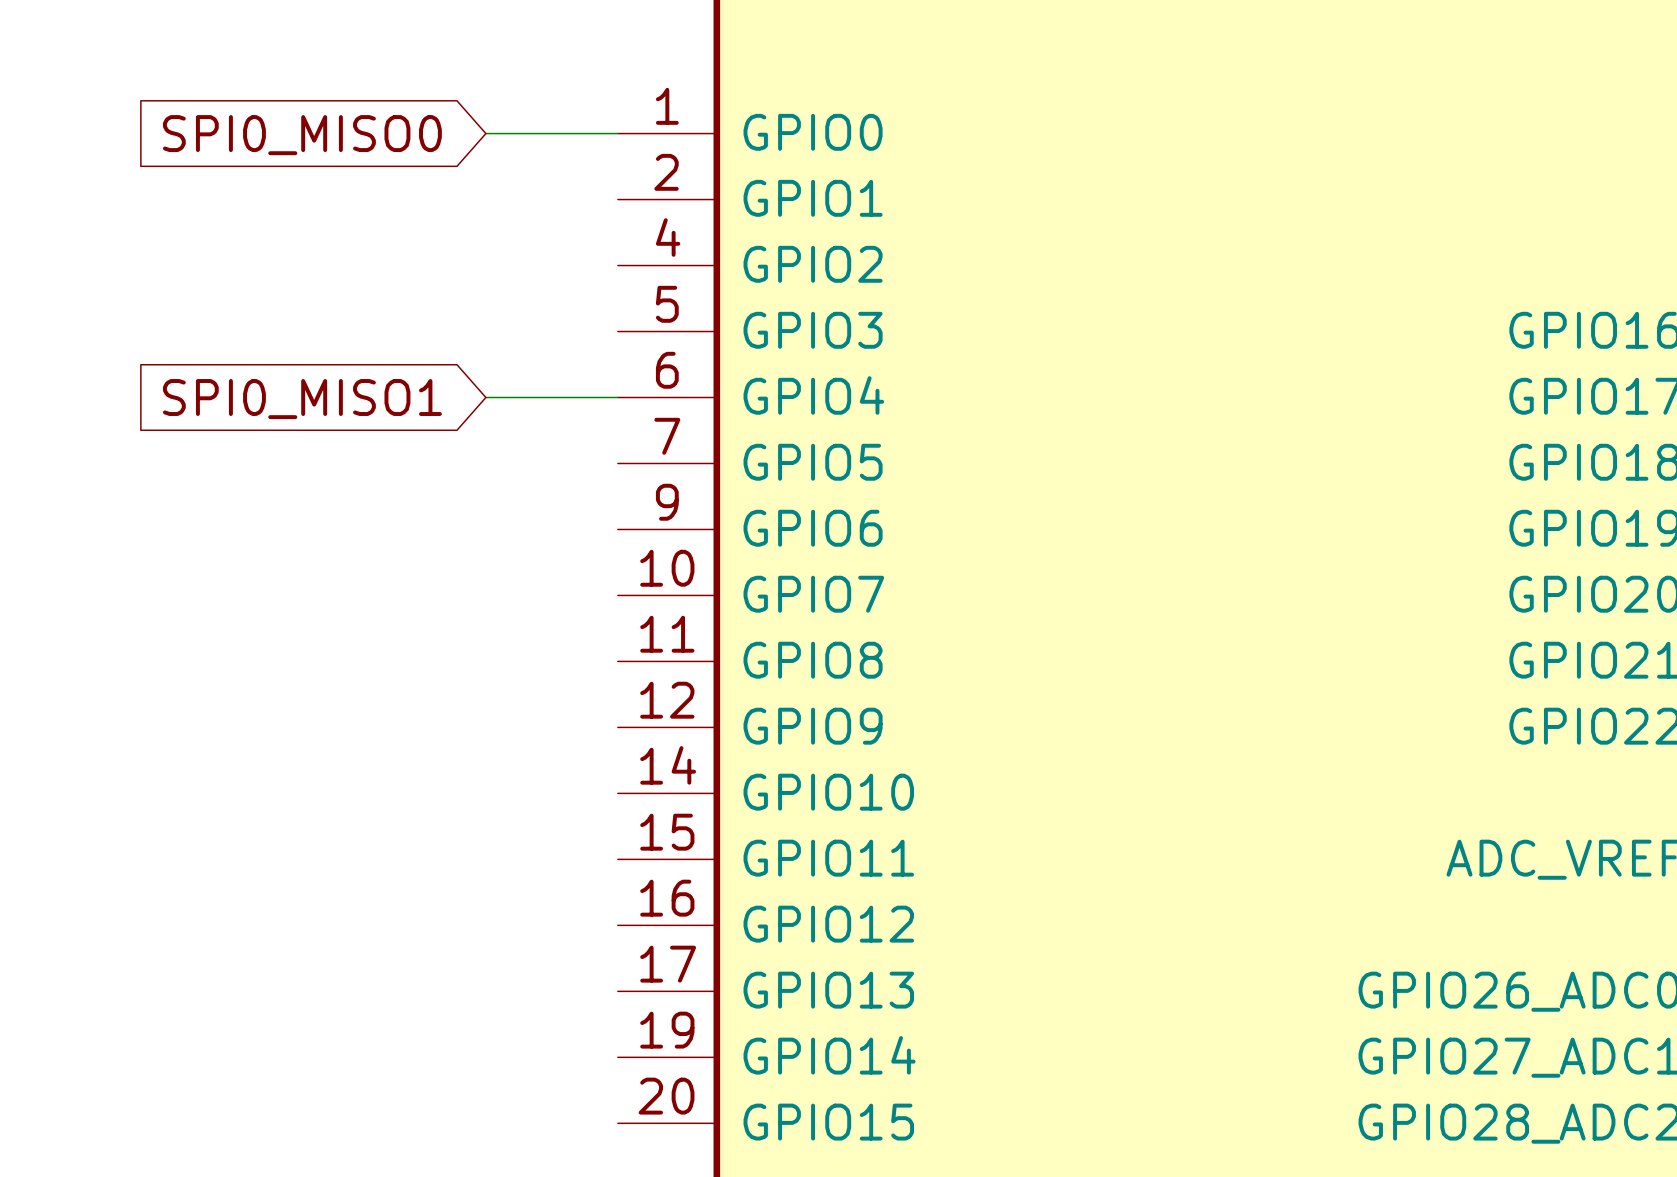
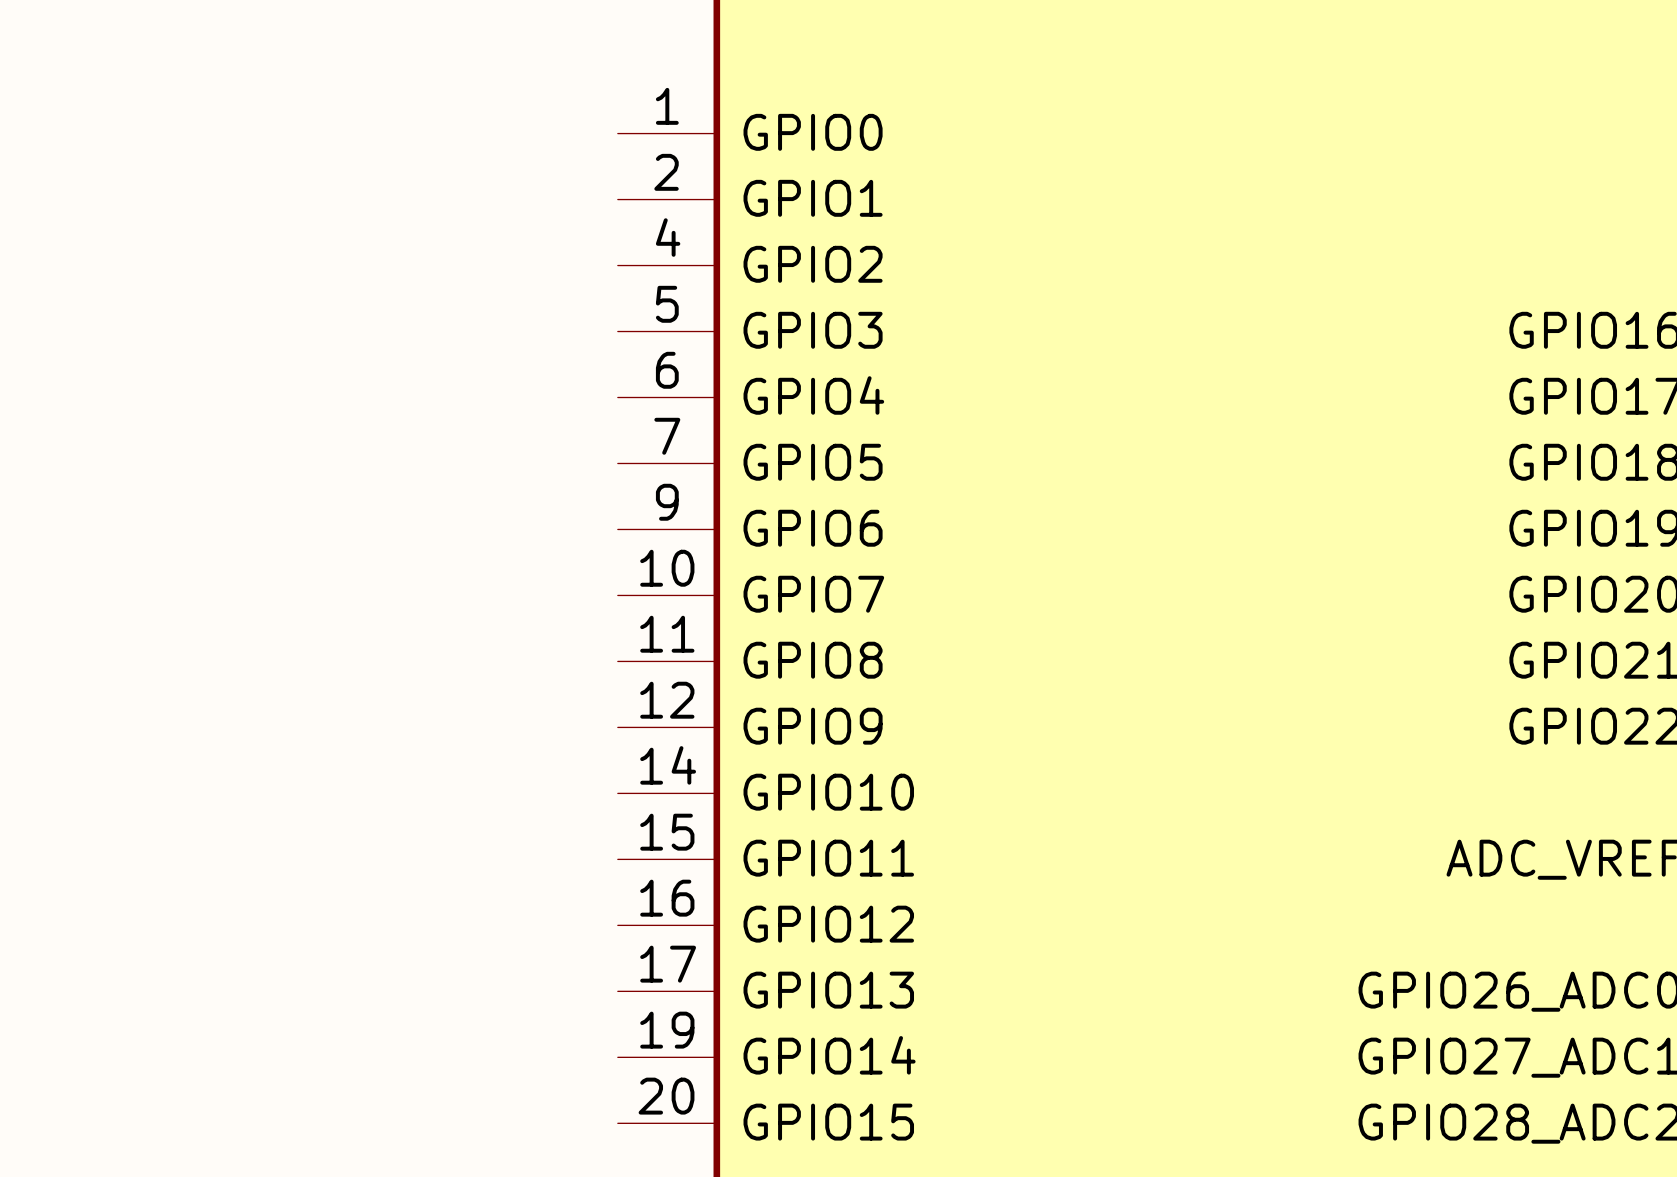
wire: (485, 133) (617, 133) -> none
global label: SPI0_MISO0 (302, 135) -> none
wire: (485, 397) (617, 397) -> none
global label: SPI0_MISO1 (302, 399) -> none

